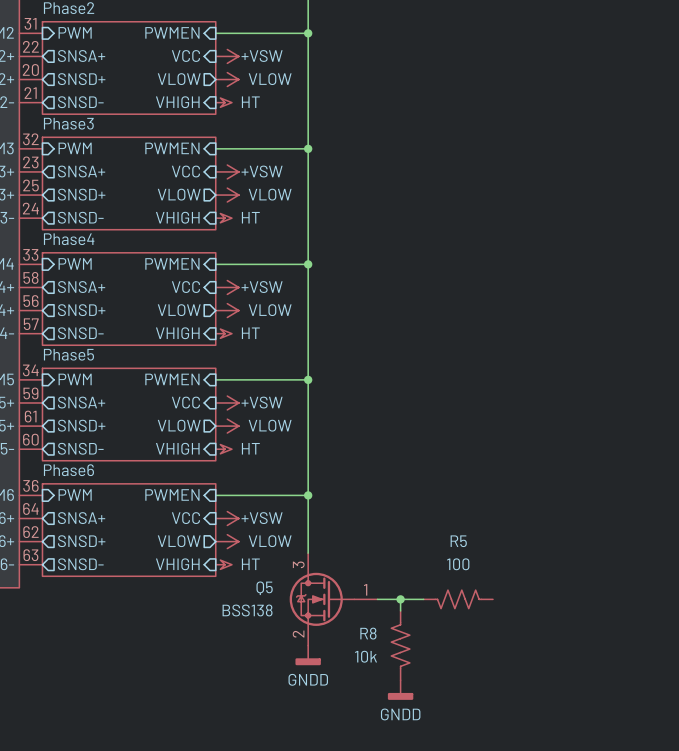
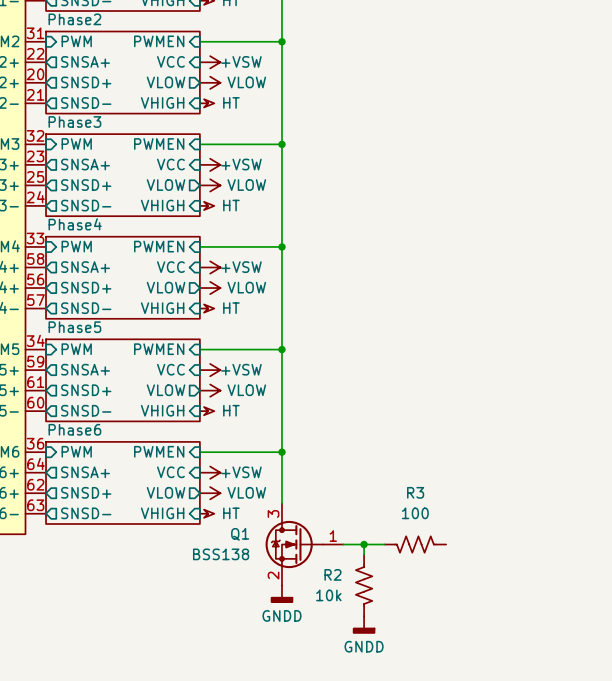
R5 name: R5 (458, 541) -> R3 (415, 492)
Q5 name: Q5 (264, 588) -> Q1 (240, 534)
R8 name: R8 (368, 633) -> R2 (332, 574)

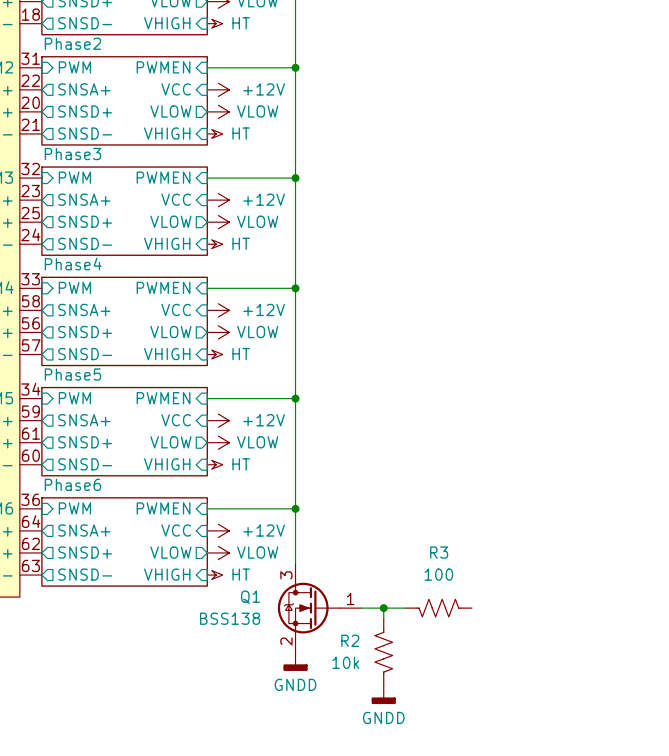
power symbol: +VSW (210, 62) -> +12V (218, 89)
power symbol: +VSW (210, 164) -> +12V (218, 200)
power symbol: +VSW (210, 267) -> +12V (218, 310)
power symbol: +VSW (210, 370) -> +12V (218, 420)
power symbol: +VSW (210, 472) -> +12V (218, 530)

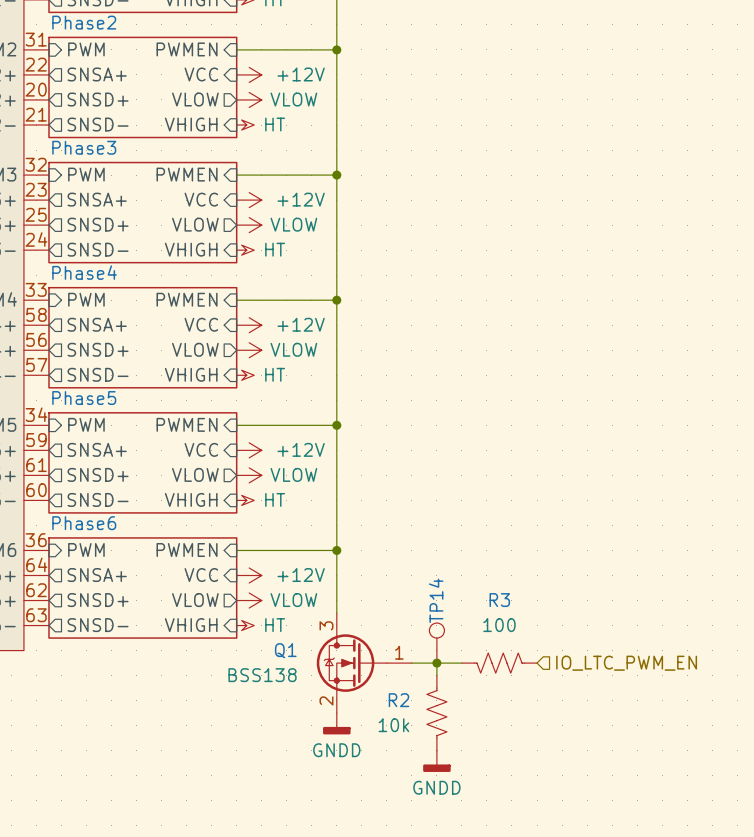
TP14: none -> (436, 643)
hierarchical label: none -> IO_LTC_PWM_EN (626, 663)

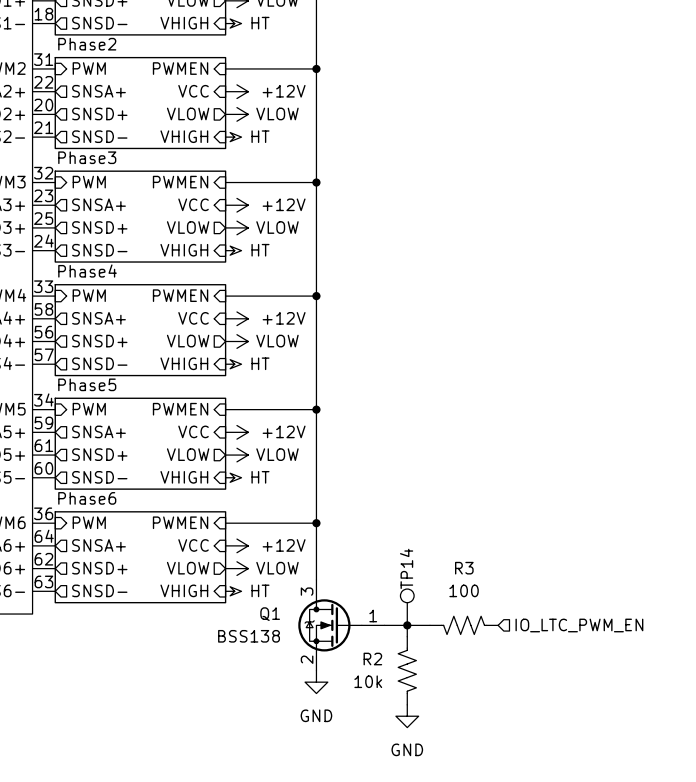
power symbol: GNDD (336, 723) -> GND (316, 682)
power symbol: GNDD (436, 761) -> GND (407, 716)

